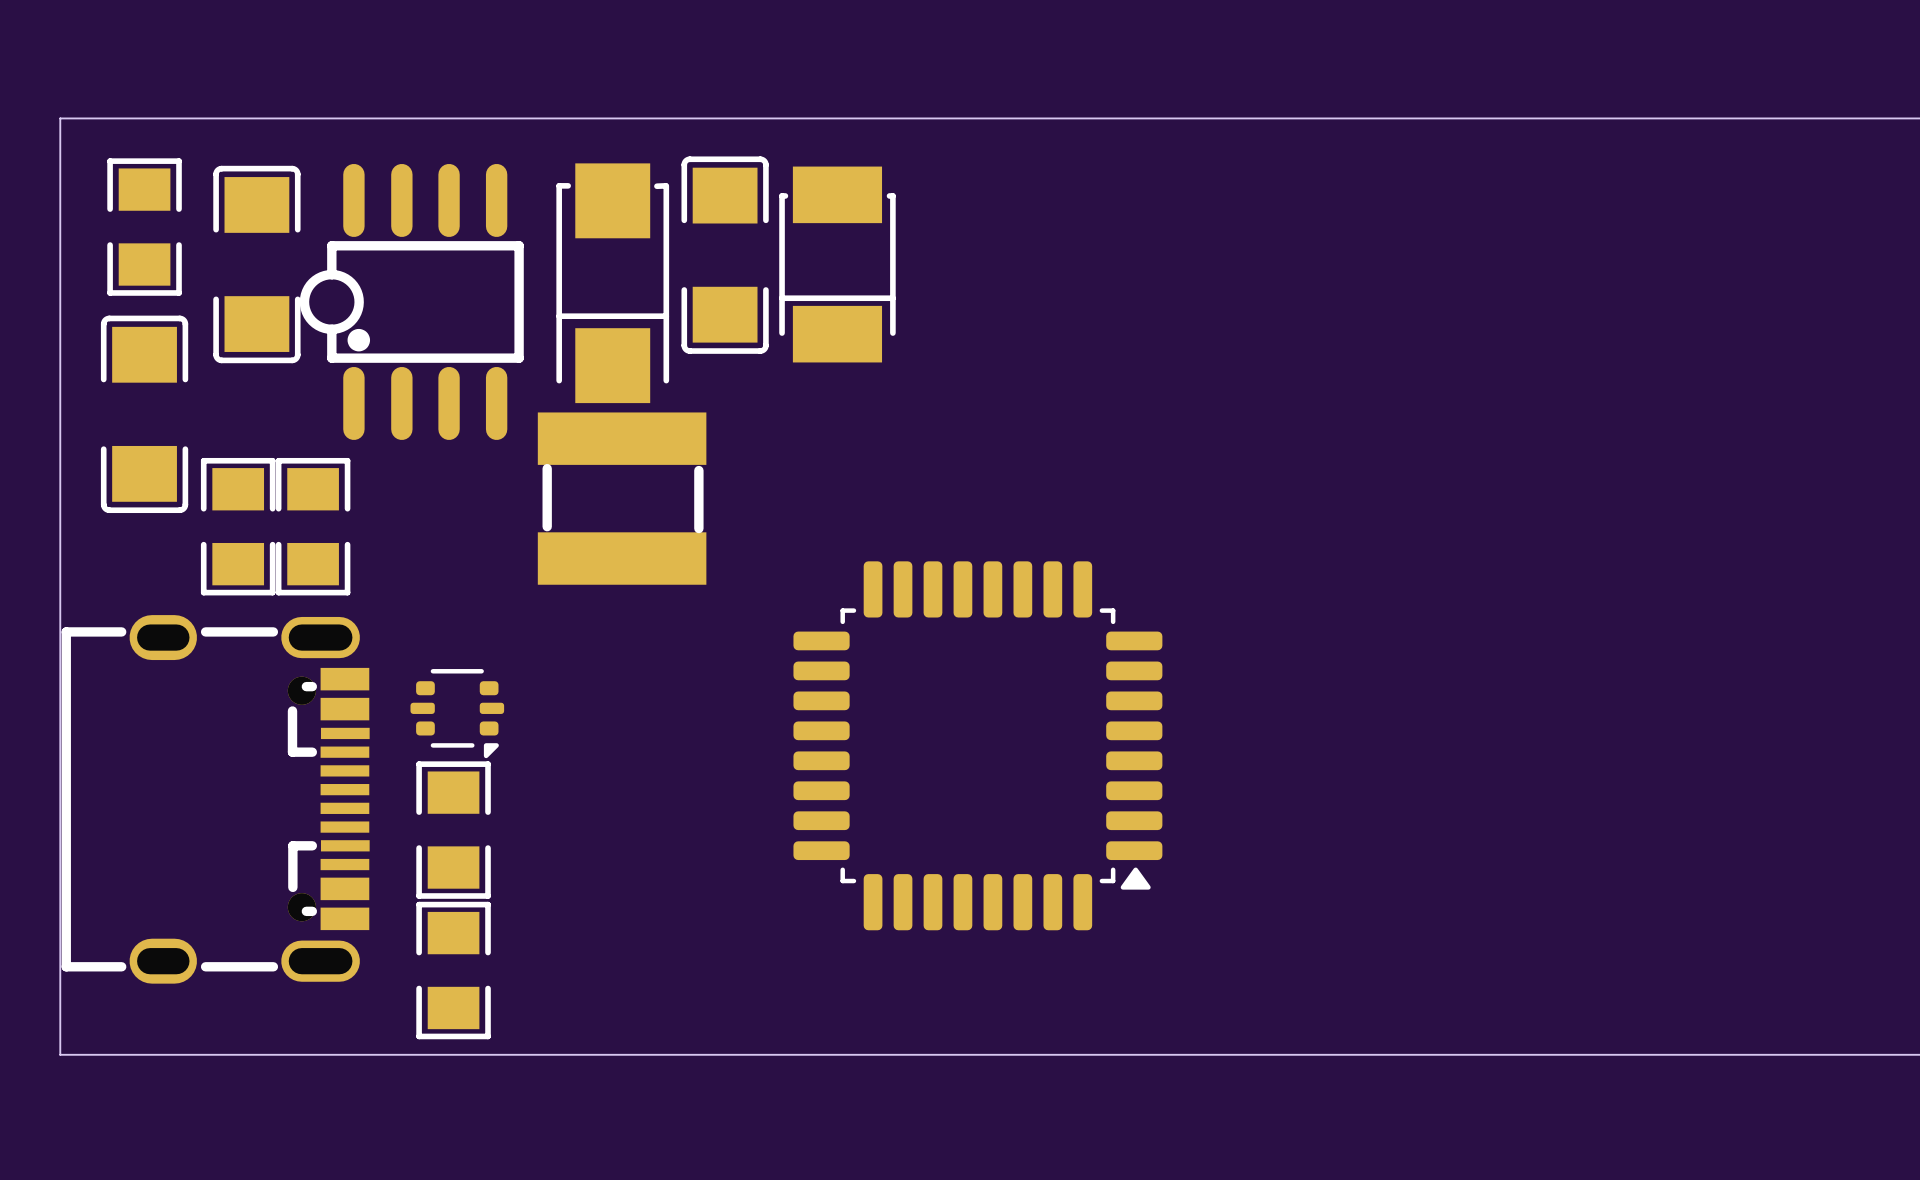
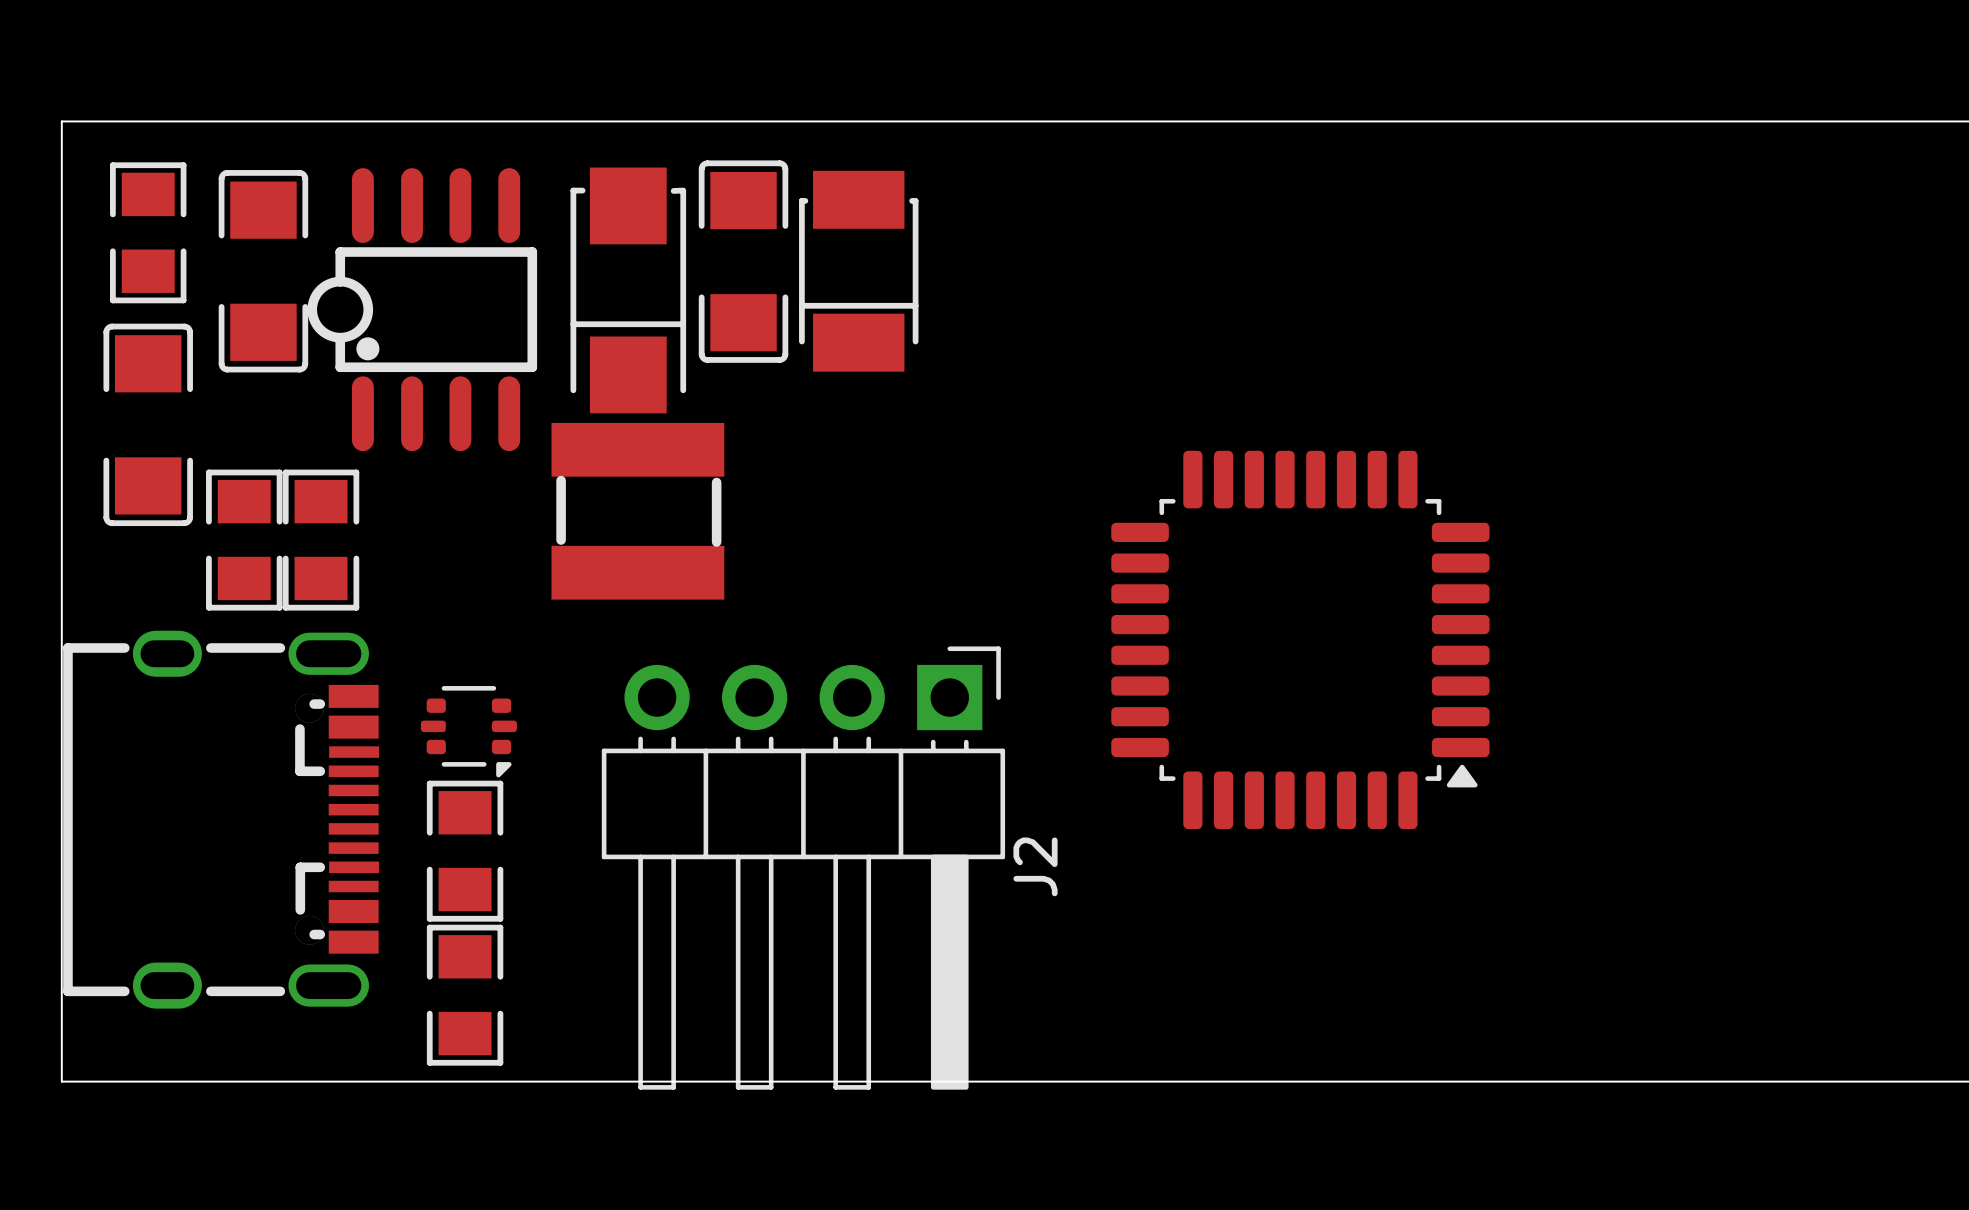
part position: (977, 745) -> (1300, 639)
J2: none -> (803, 868)

